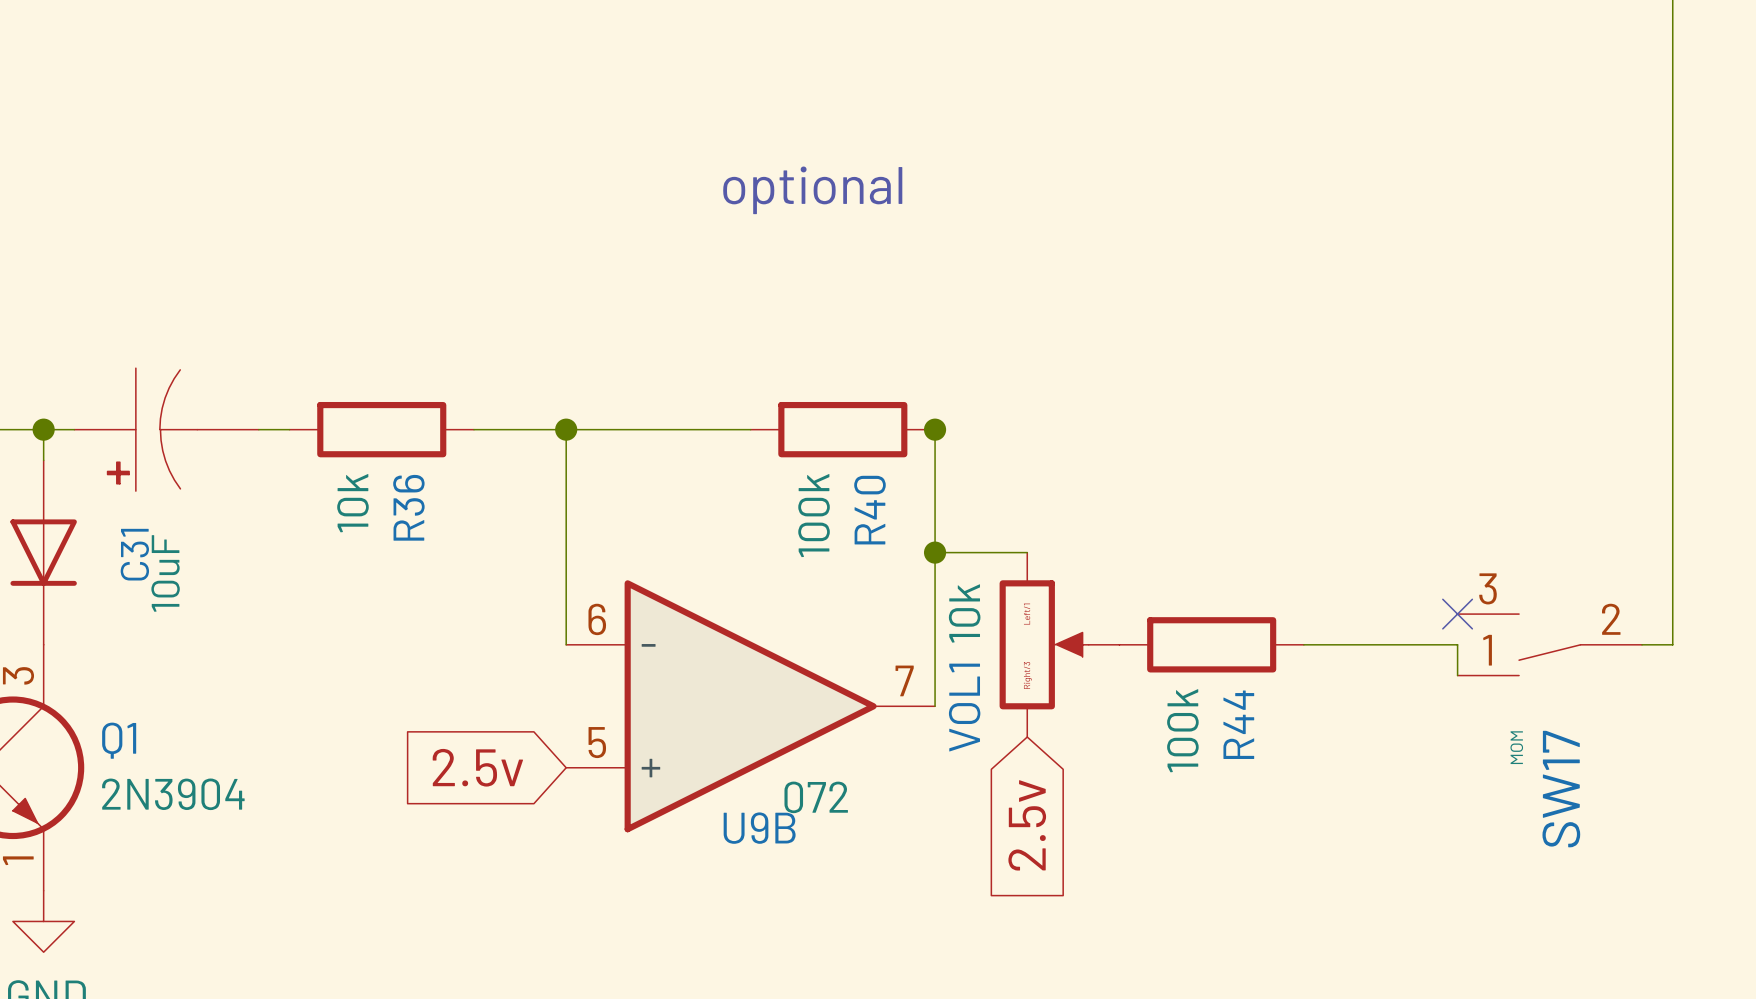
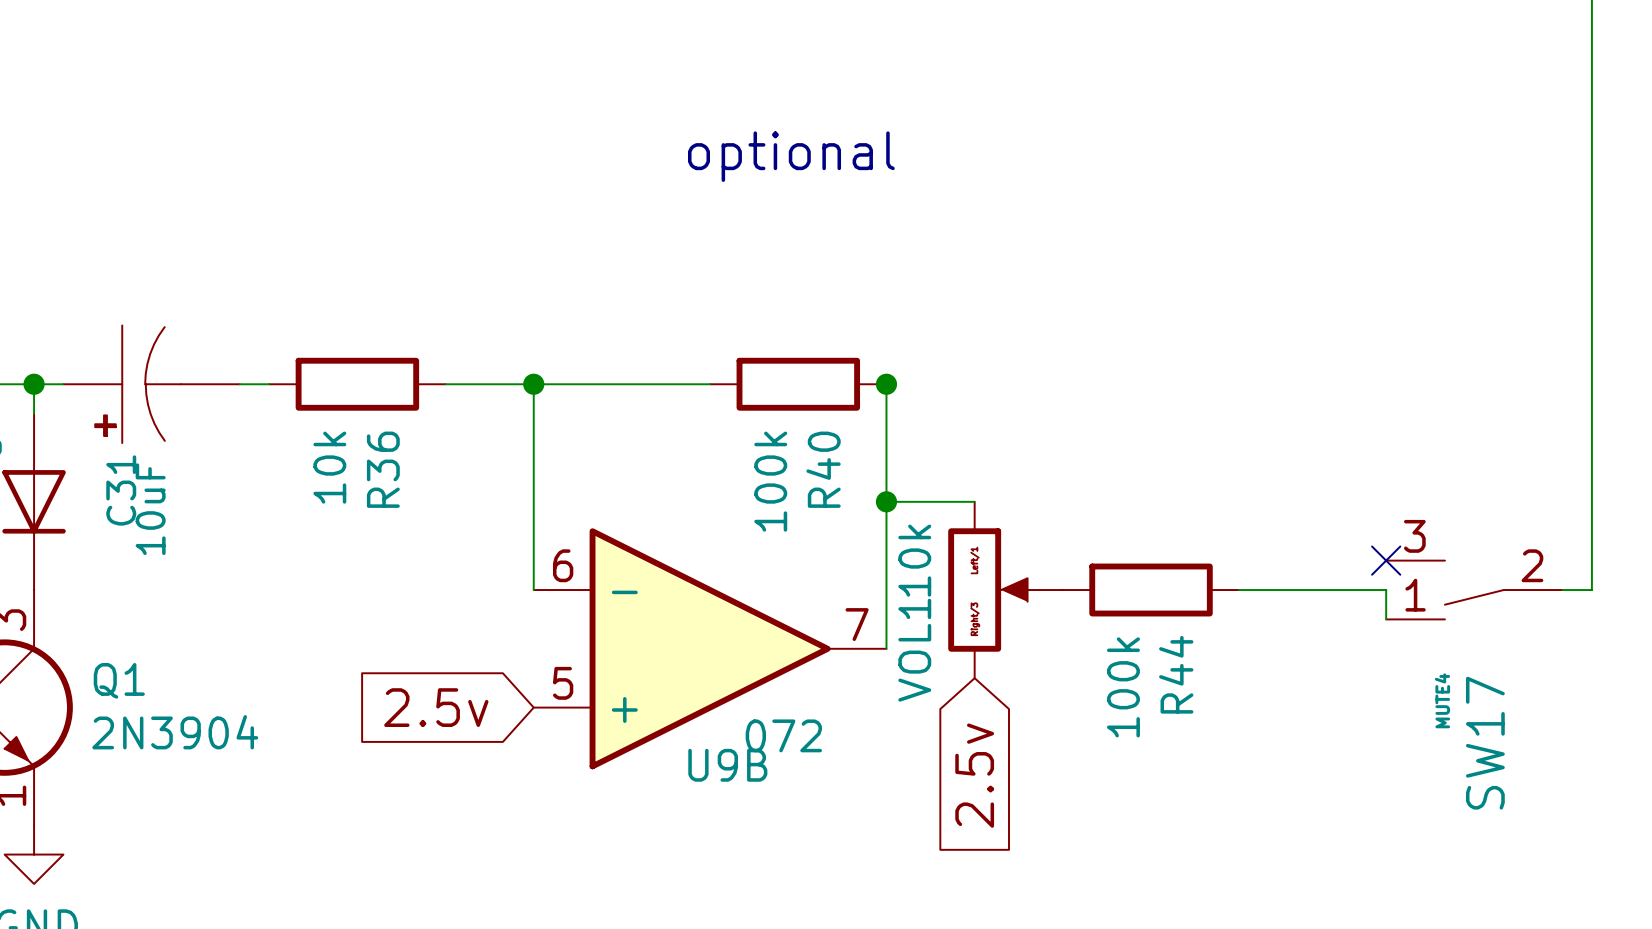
SW17 value: MOM (1516, 747) -> MUTE4 (1442, 700)

